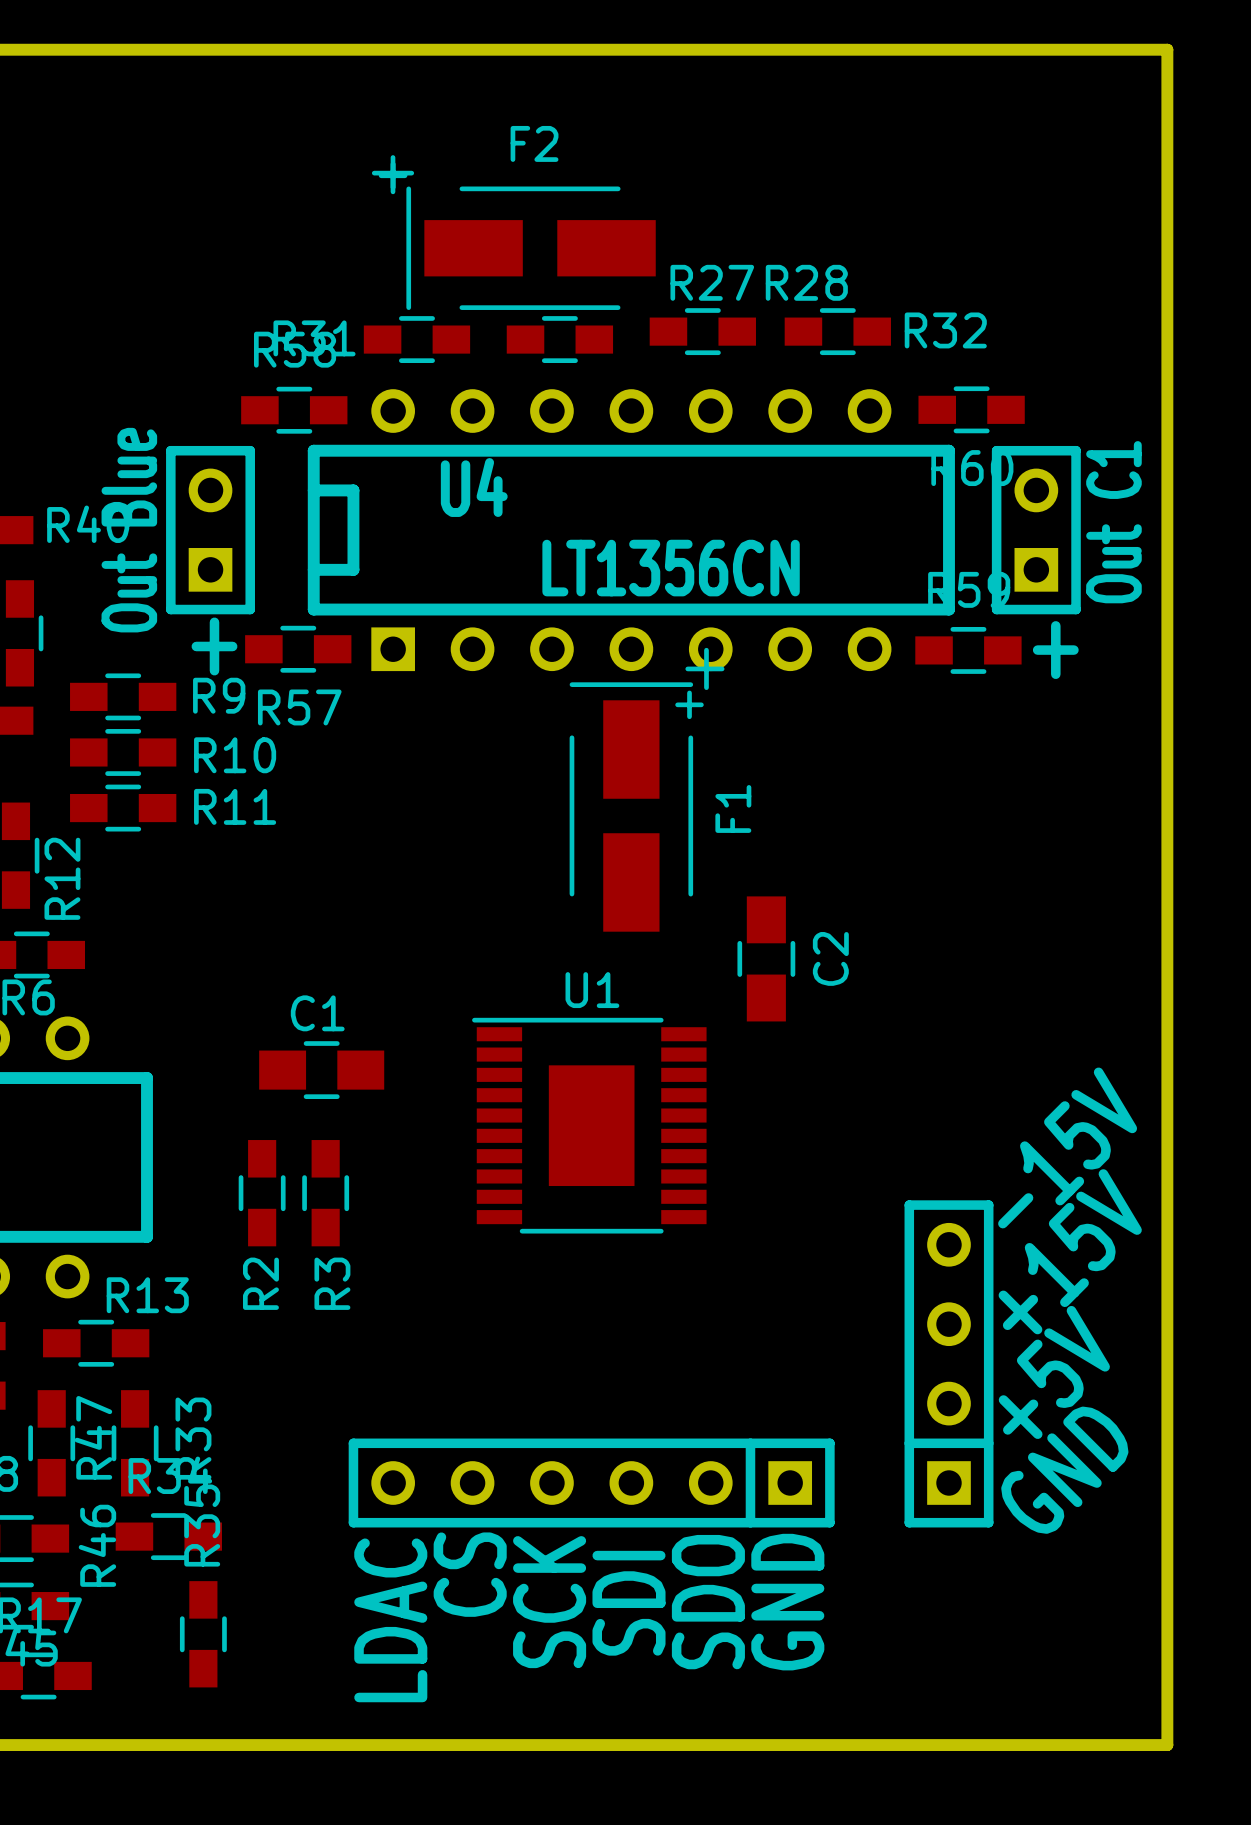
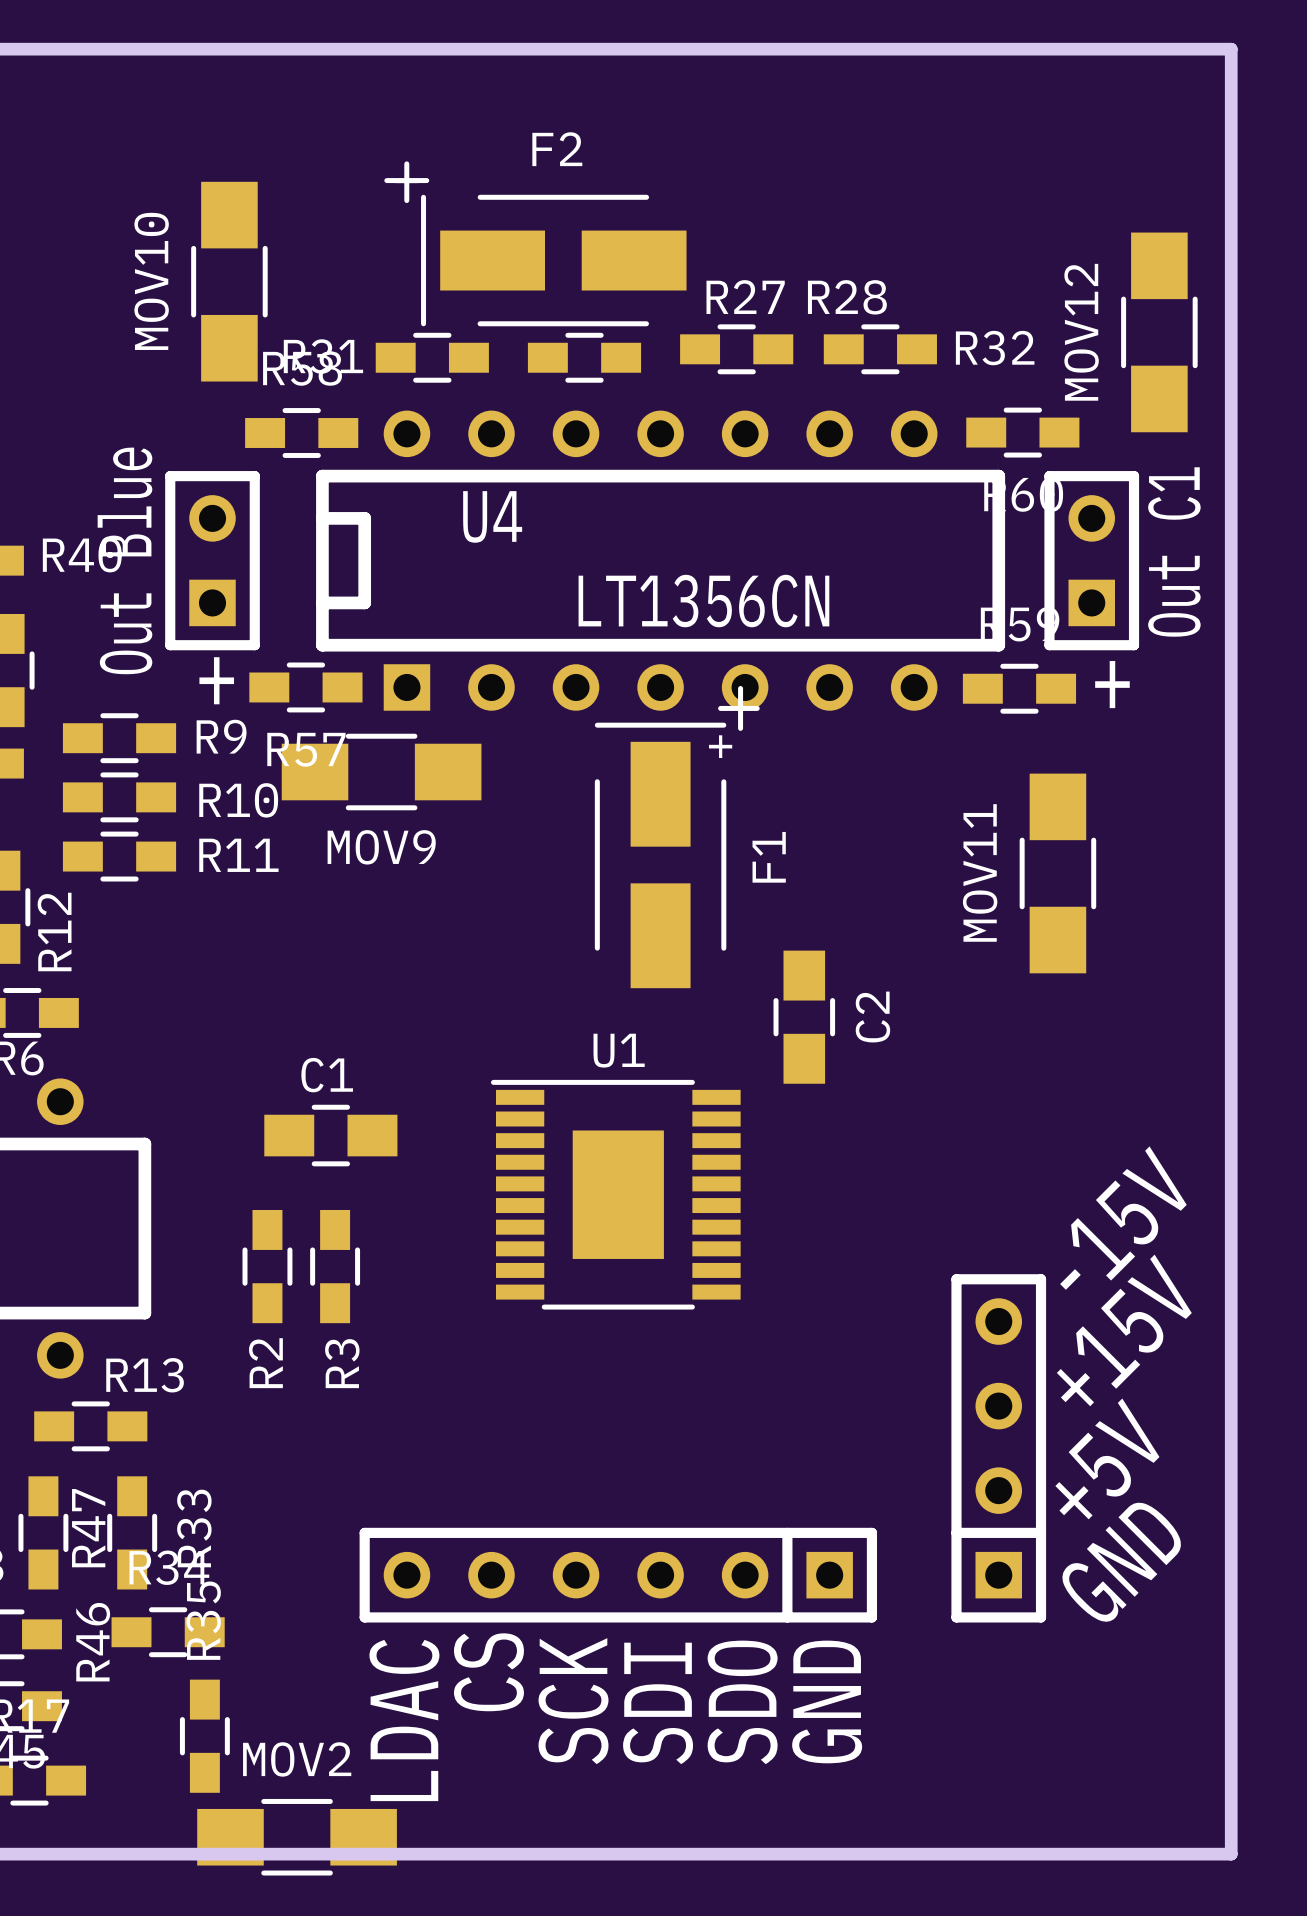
MOV10: none -> (229, 281)
MOV12: none -> (1159, 332)
MOV9: none -> (381, 772)
MOV11: none -> (1057, 873)
MOV2: none -> (297, 1837)

